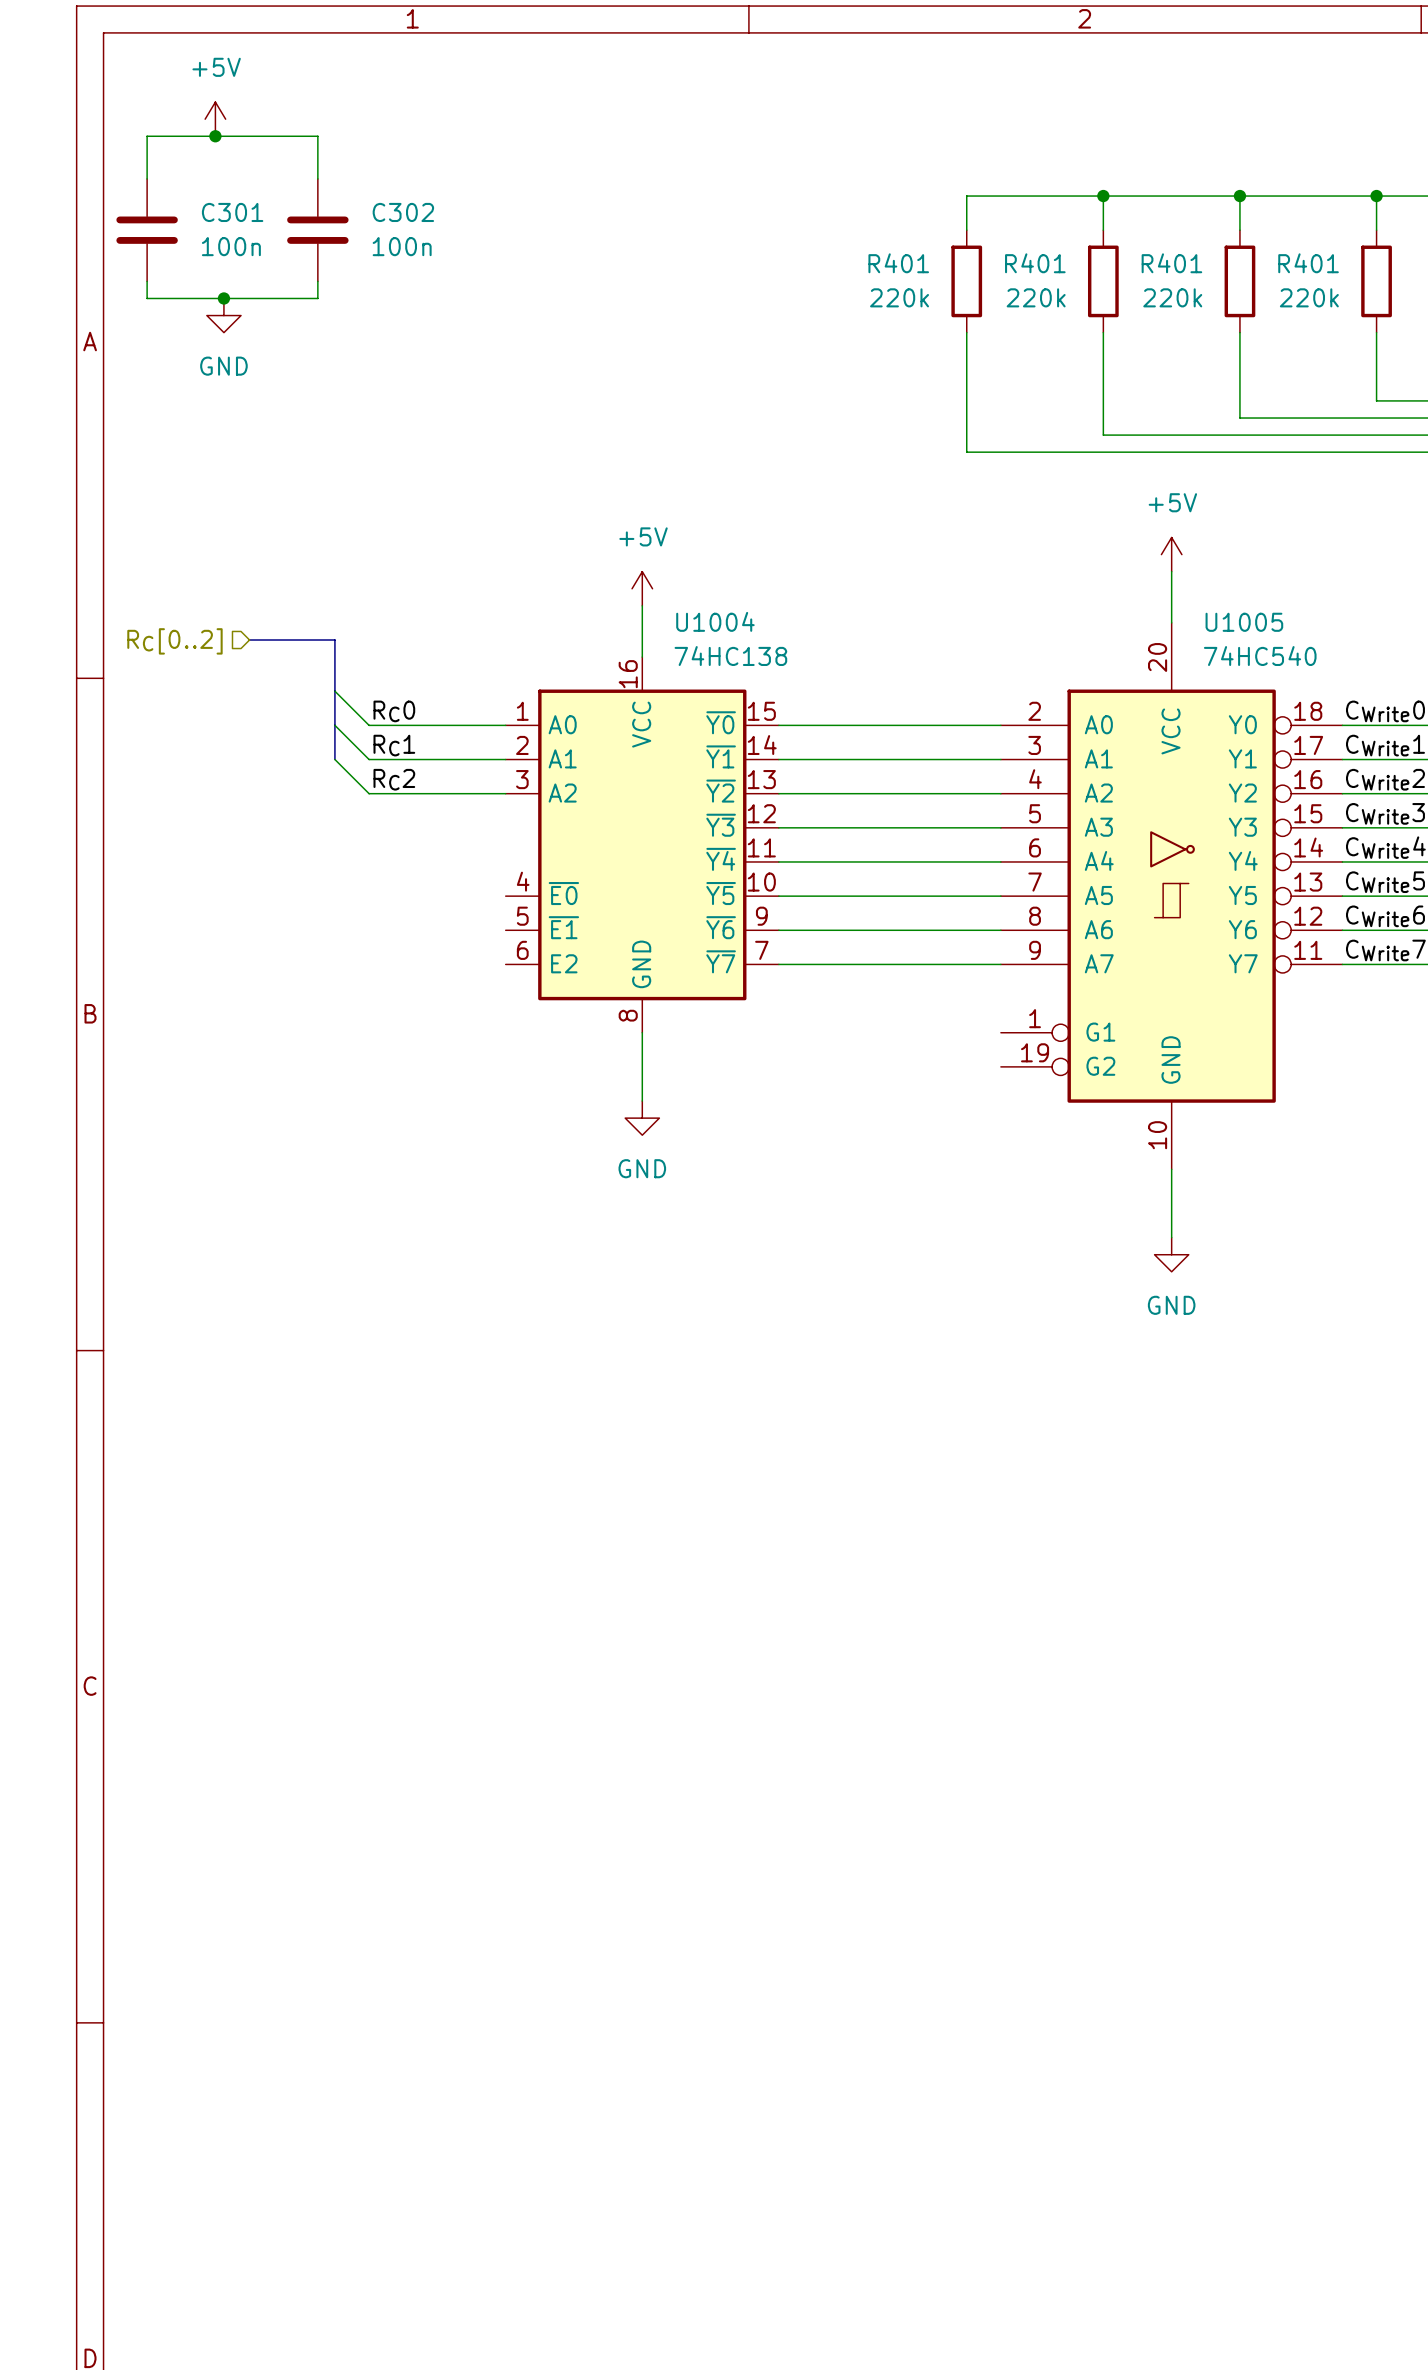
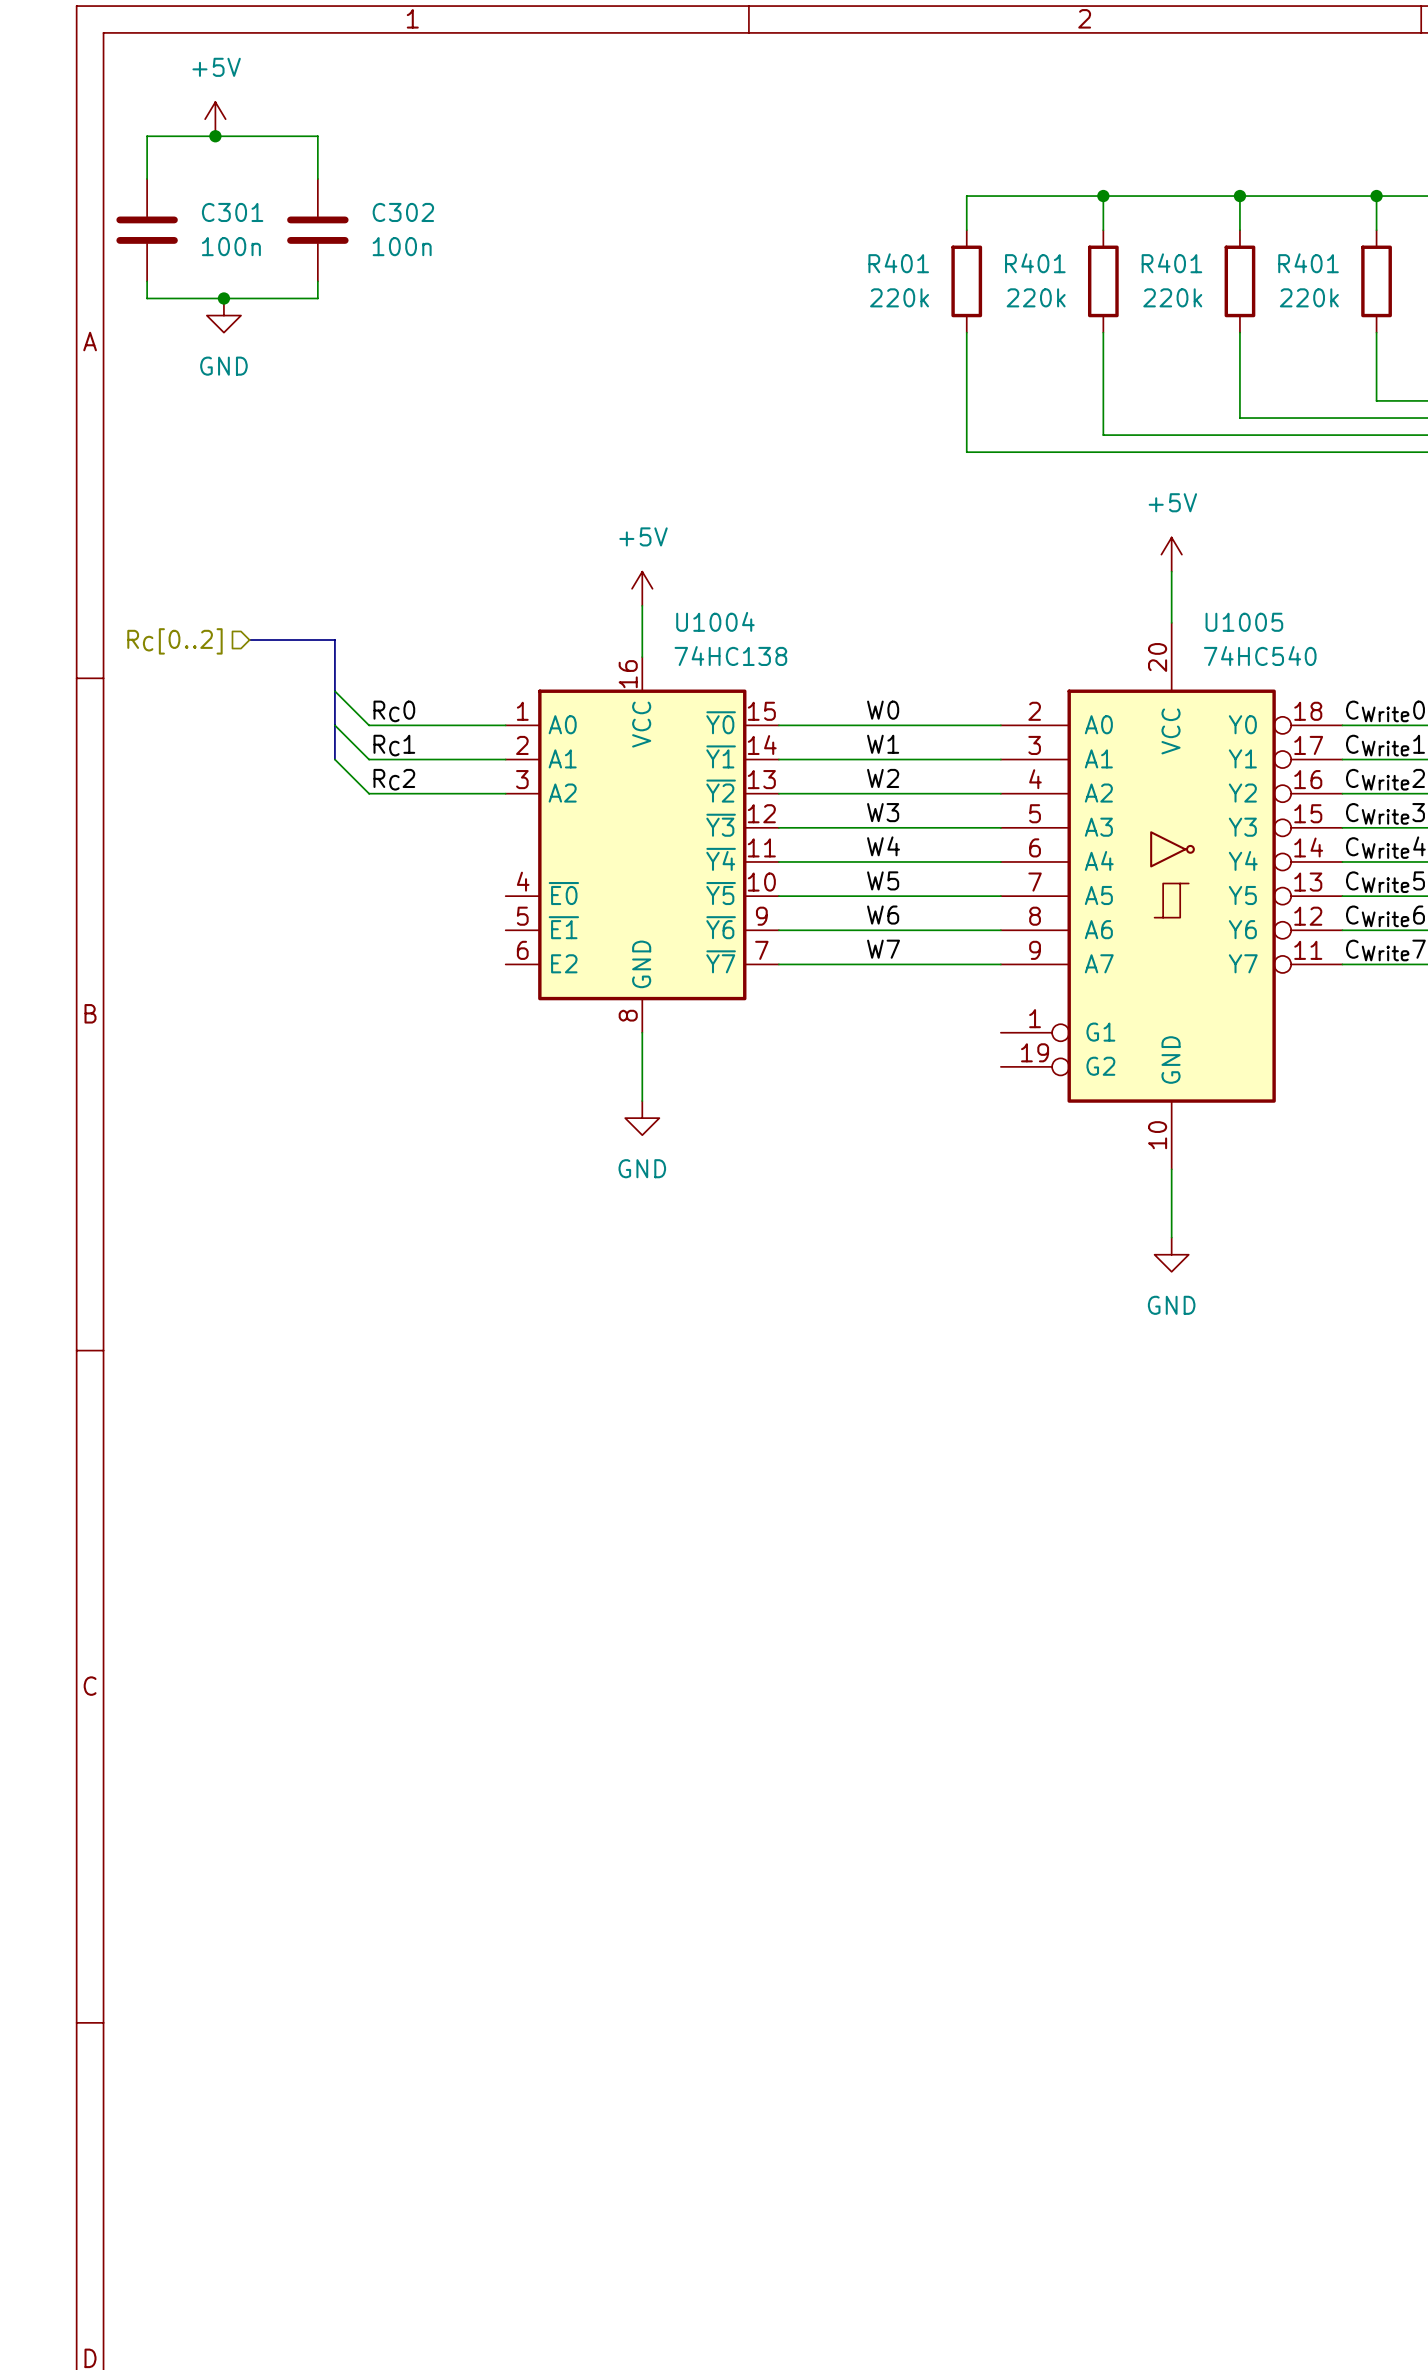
label: none -> W0 (883, 710)
label: none -> W1 (883, 744)
label: none -> W2 (883, 778)
label: none -> W3 (883, 812)
label: none -> W4 (883, 846)
label: none -> W5 (883, 880)
label: none -> W6 (883, 915)
label: none -> W7 (883, 949)

